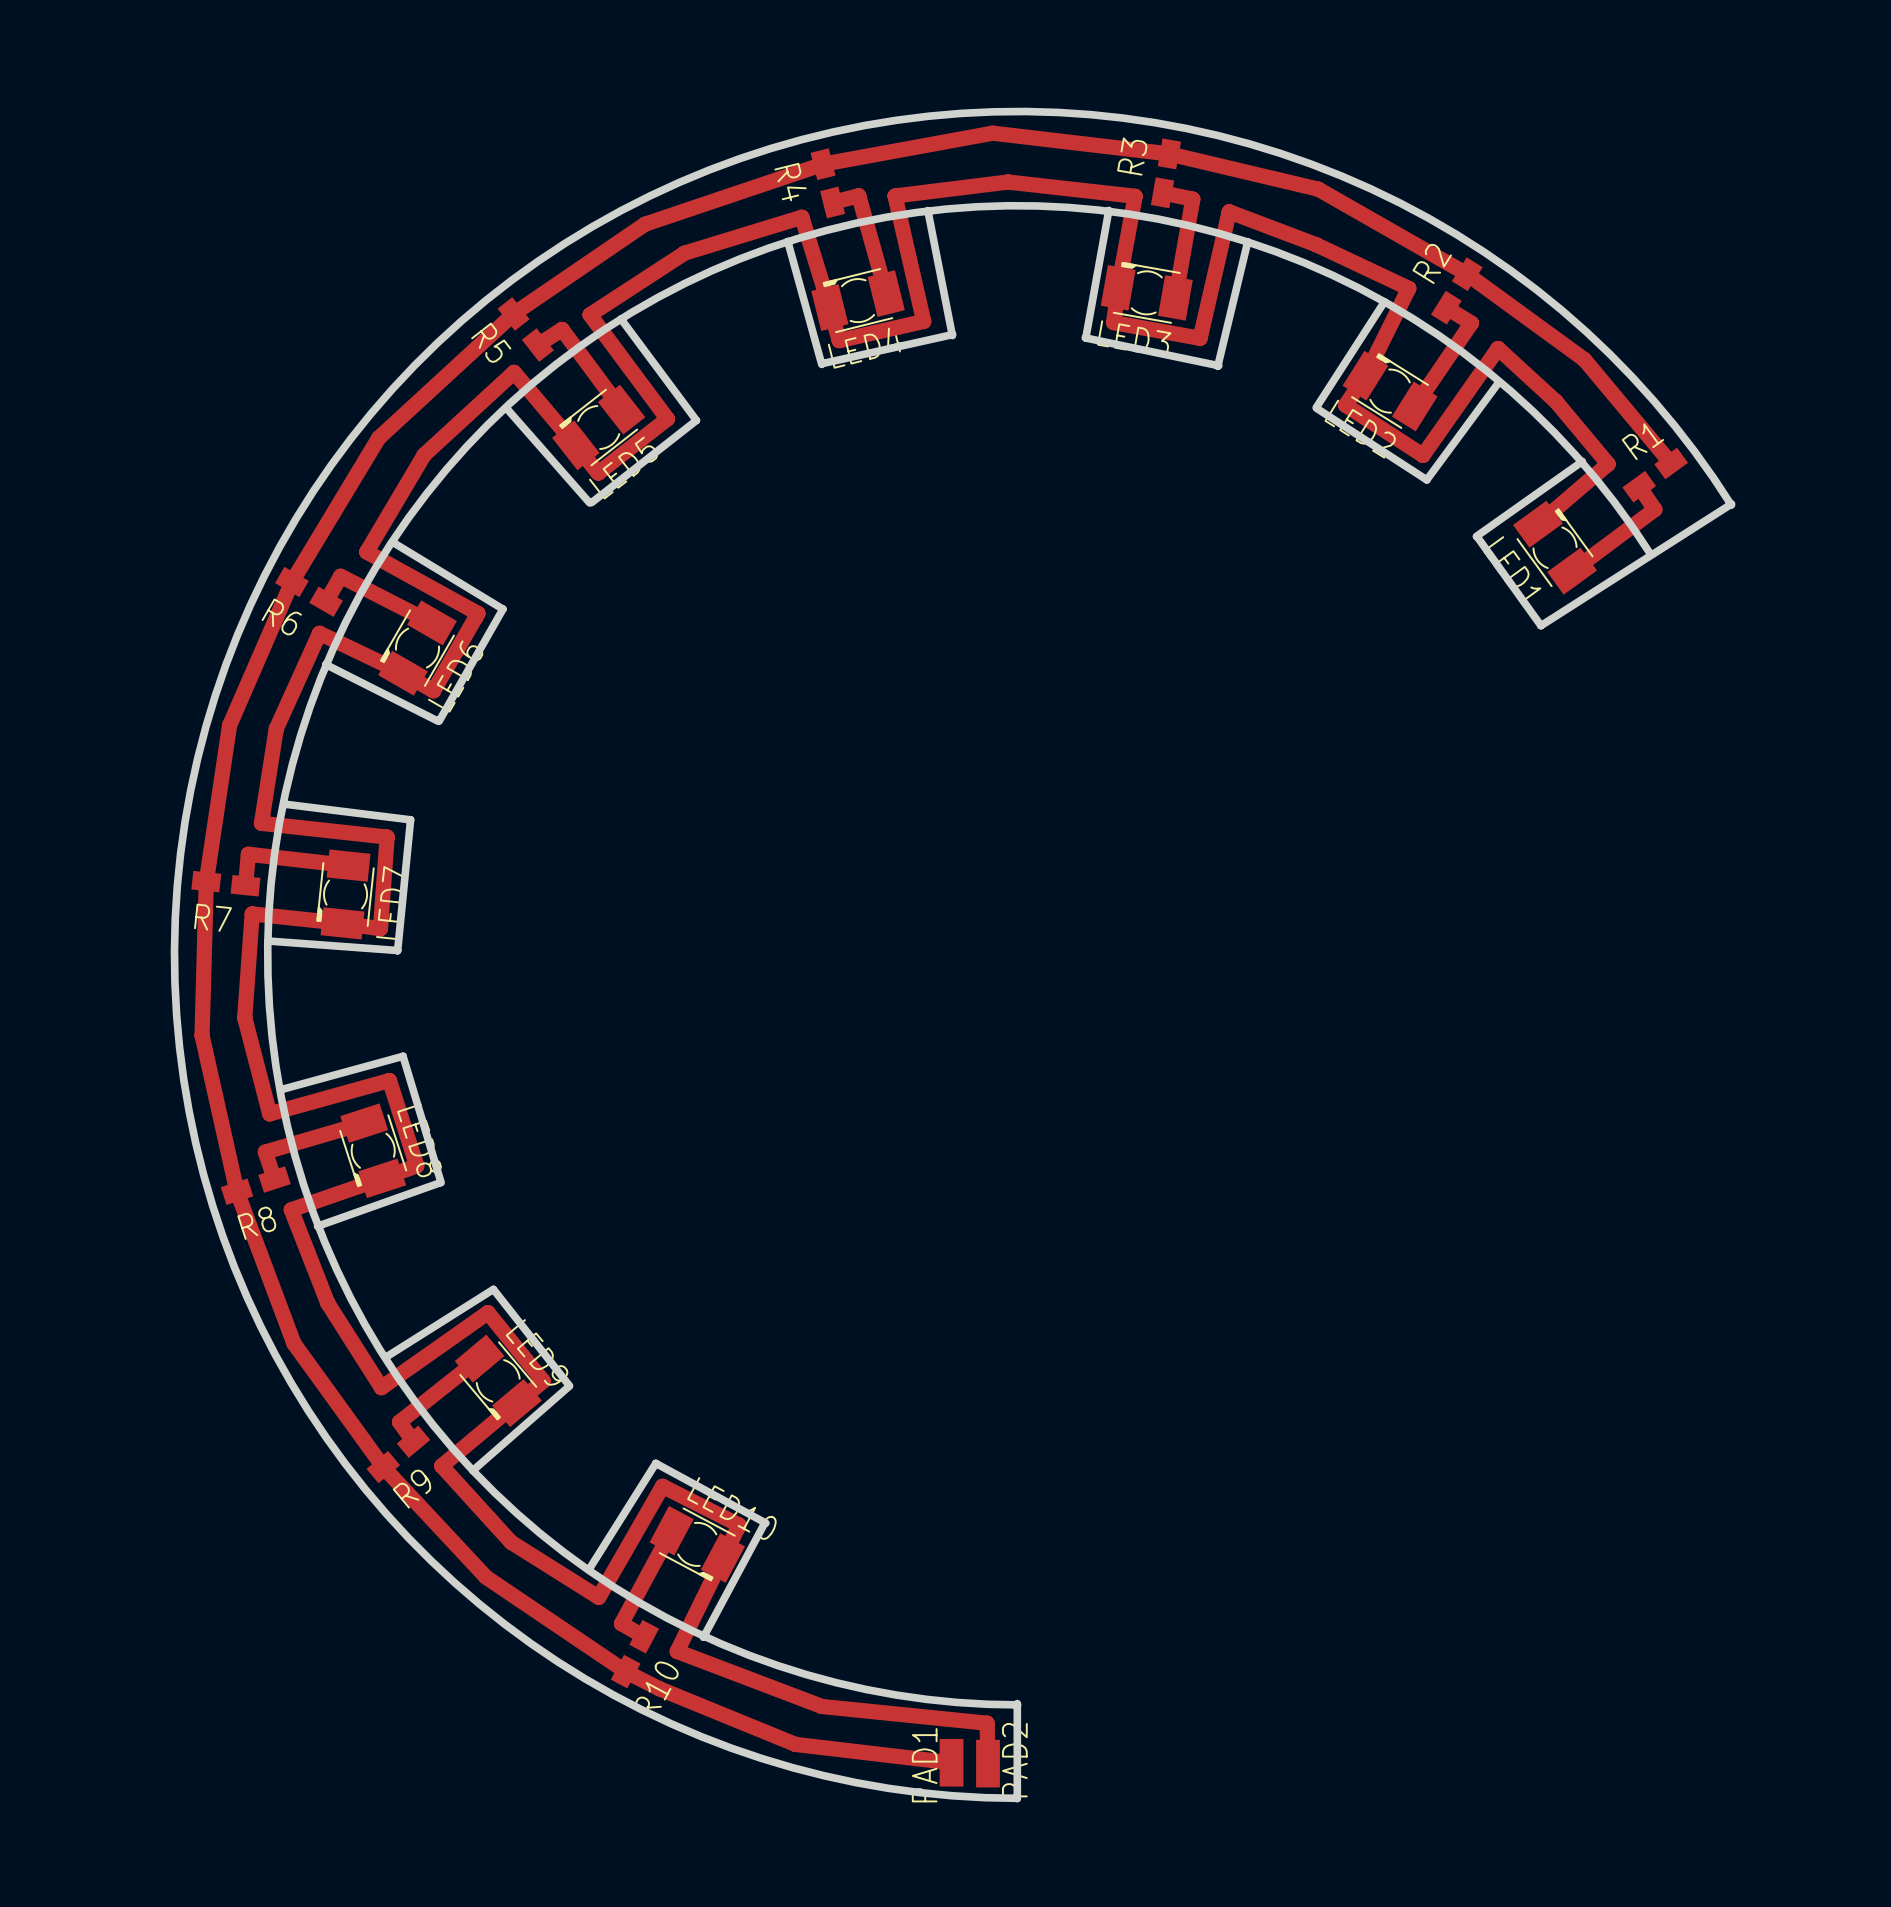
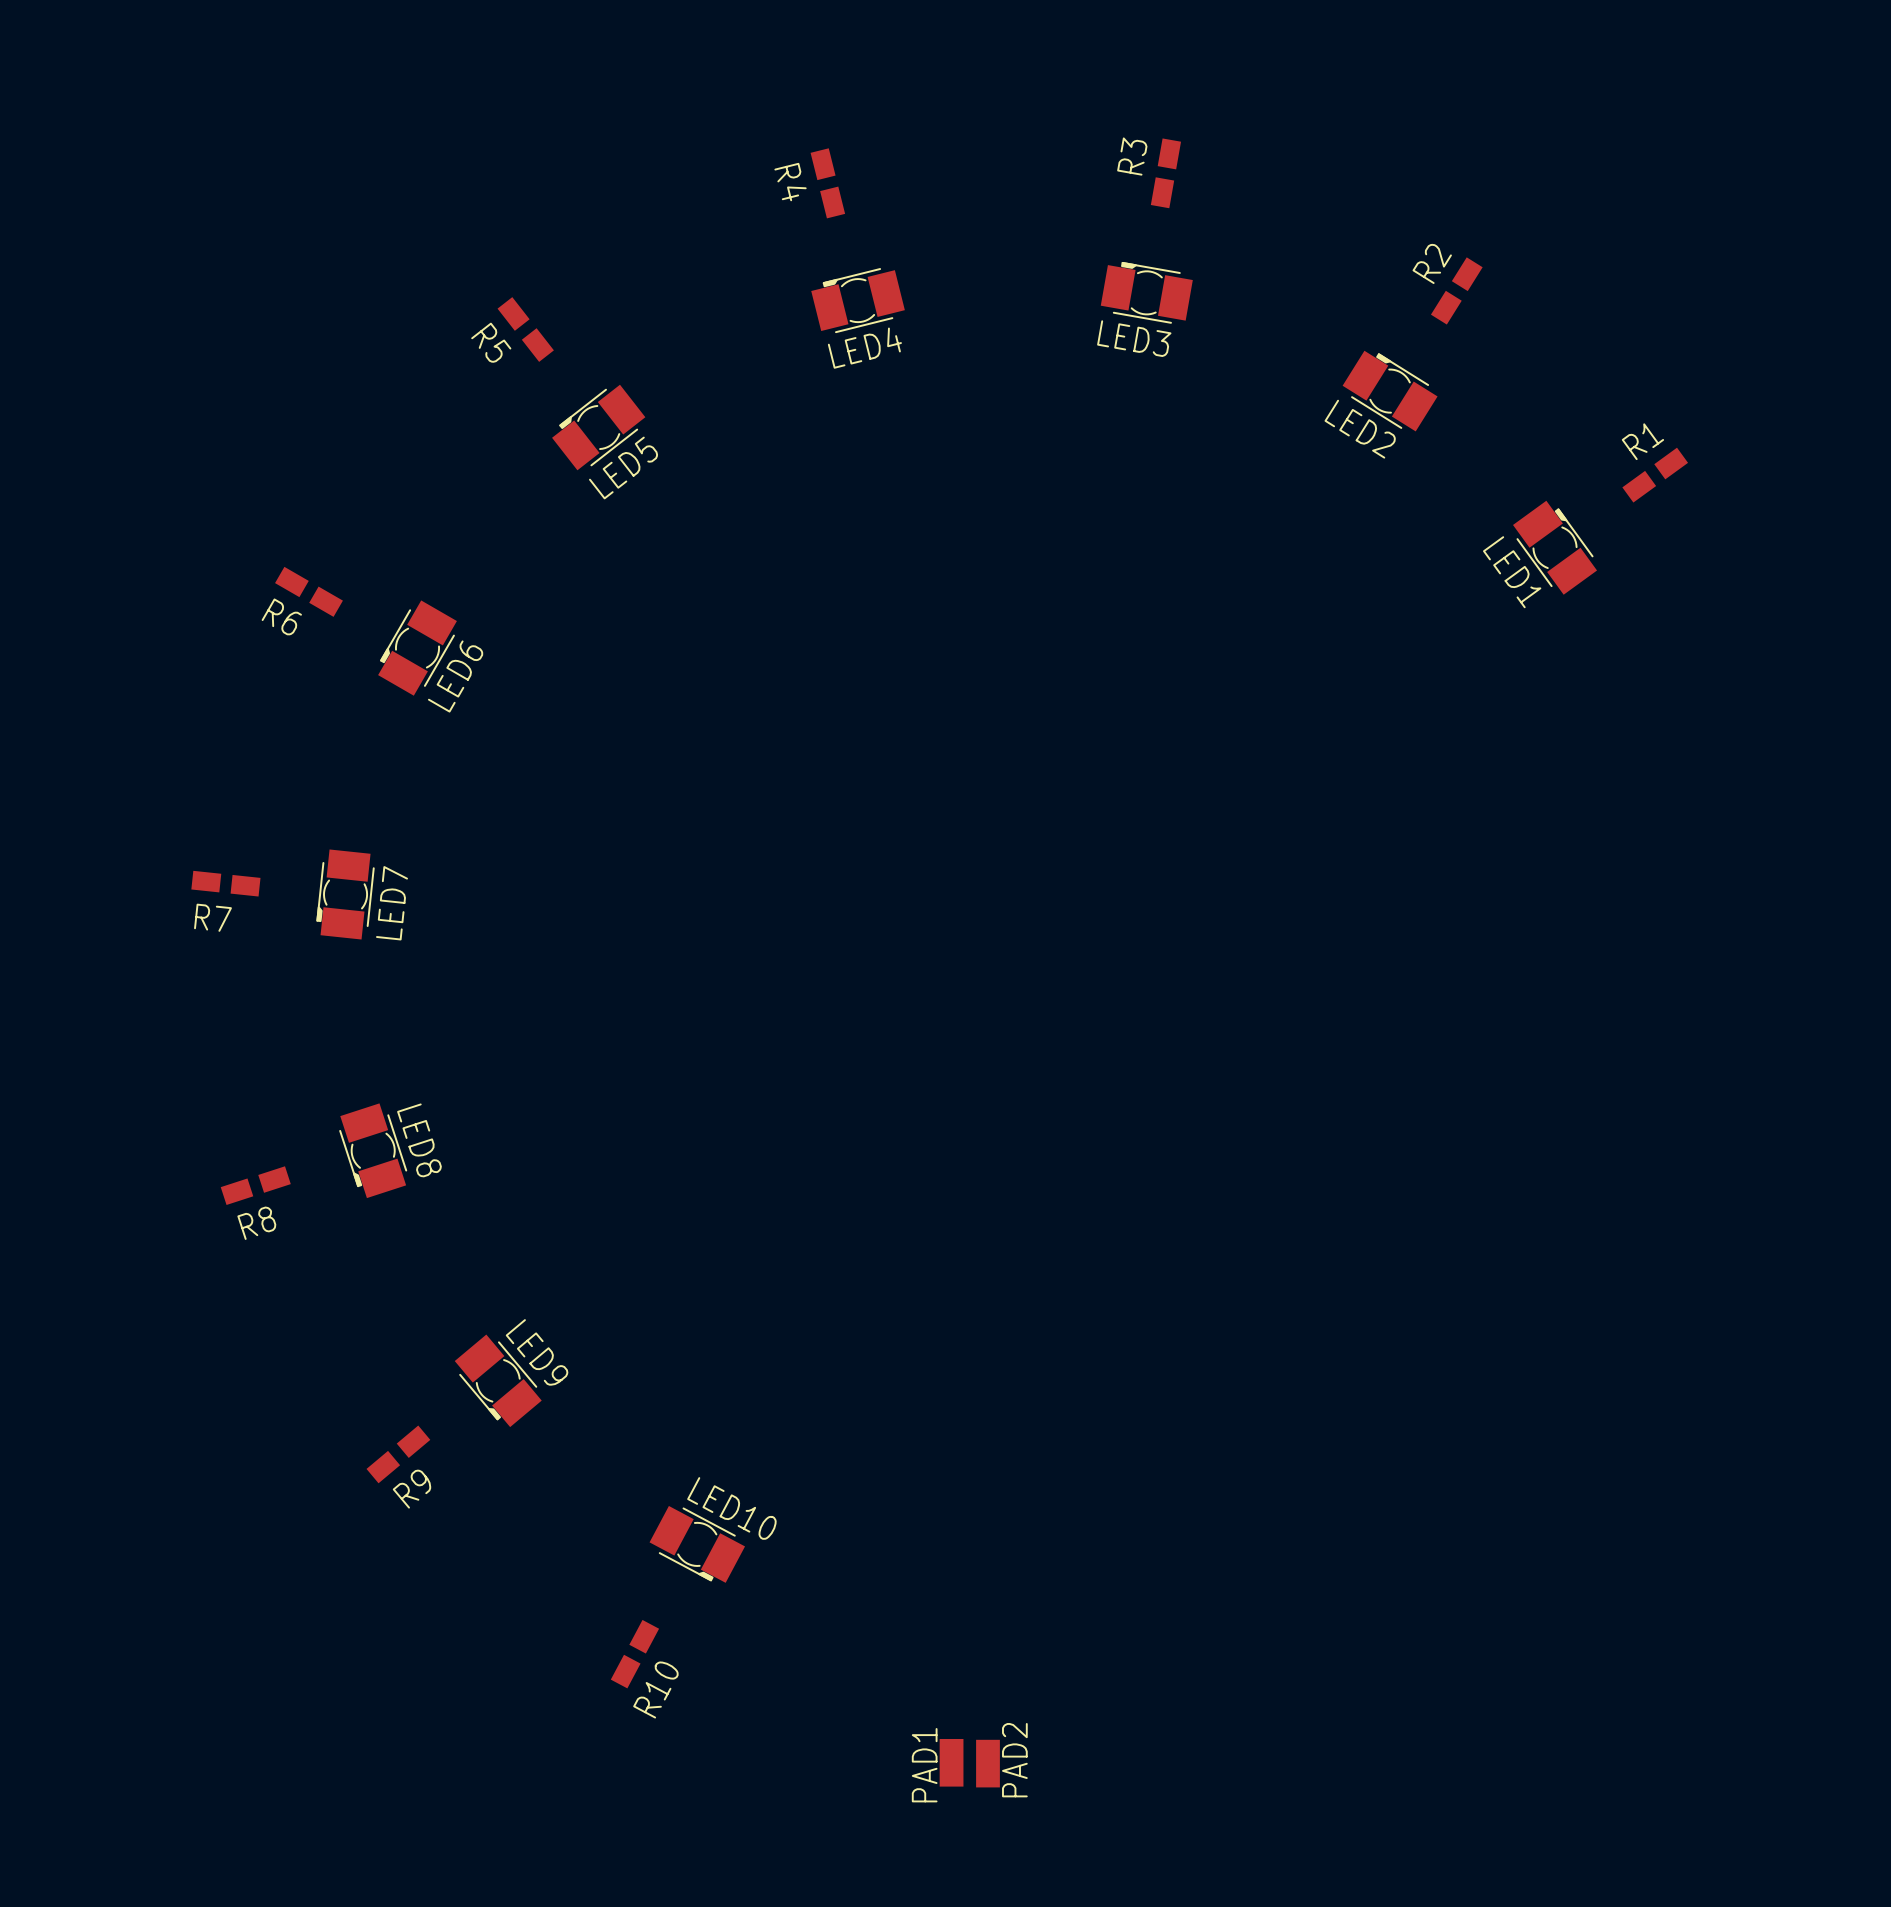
track: (1162, 192) (1192, 199) (1175, 297) -> none
track: (832, 202) (858, 195) (886, 293) -> none
board edge: (927, 210) (952, 335) -> none
board edge: (1108, 210) (1085, 337) -> none
board edge: (787, 241) (821, 364) -> none
board edge: (1247, 241) (1217, 366) -> none
board edge: (1384, 301) (1316, 407) -> none
track: (1446, 307) (1471, 323) (1414, 406) -> none
board edge: (621, 318) (696, 420) (591, 502) -> none
board edge: (952, 334) (823, 363) -> none
board edge: (1085, 337) (1218, 365) -> none
track: (537, 345) (562, 329) (621, 409) -> none
board edge: (1497, 384) (1426, 479) (1316, 408) -> none
board edge: (506, 407) (589, 502) -> none
board edge: (1582, 461) (1476, 536) -> none
track: (1671, 463) (1584, 359) (1467, 274) (1318, 189) (1169, 153) (992, 133) (823, 164) (645, 224) (513, 313) (378, 438) (291, 582) (229, 725) (206, 881) (202, 1035) (237, 1191) (294, 1343) (383, 1467) (486, 1577) (625, 1671) (659, 1688) (795, 1744) (951, 1762) -> none
track: (1639, 486) (1654, 509) (1572, 571) -> none
board edge: (1731, 503) (1540, 625) (1477, 537) -> none
board edge: (1731, 505) (1694, 451) (1654, 401) (1586, 331) (1510, 270) (1456, 234) (1400, 203) (1311, 164) (1218, 135) (1154, 122) (1090, 114) (993, 111) (928, 116) (864, 125) (770, 148) (679, 182) (592, 226) (538, 261) (486, 300) (414, 365) (371, 413) (331, 464) (279, 547) (237, 634) (205, 726) (185, 821) (177, 885) (174, 950) (176, 1015) (183, 1079) (203, 1174) (222, 1236) (246, 1296) (291, 1383) (345, 1463) (386, 1513) (431, 1560) (504, 1624) (557, 1661) (613, 1694) (701, 1736) (761, 1758) (824, 1775) (920, 1792) (1017, 1798) -> none
track: (1537, 524) (1608, 464) (1555, 401) (1498, 348) (1422, 455) (1345, 405) (1365, 375) (1408, 288) (1315, 244) (1229, 211) (1200, 338) (1113, 322) (1135, 196) (1008, 182) (895, 196) (923, 321) (839, 340) (801, 217) (684, 253) (590, 314) (667, 418) (598, 473) (514, 372) (424, 454) (366, 552) (477, 613) (433, 690) (402, 673) (319, 633) (276, 728) (261, 823) (387, 837) (380, 928) (252, 913) (244, 1017) (269, 1113) (389, 1080) (416, 1165) (291, 1209) (327, 1303) (381, 1387) (487, 1312) (543, 1381) (441, 1465) (511, 1542) (598, 1597) (662, 1486) (738, 1524) (677, 1651) (822, 1706) (987, 1723) (987, 1763) -> none
board edge: (394, 543) (502, 609) (439, 721) -> none
board edge: (1649, 551) (1595, 478) (1533, 411) (1463, 352) (1412, 318) (1359, 288) (1304, 262) (1247, 241) (1158, 219) (1068, 207) (976, 206) (886, 217) (797, 238) (739, 258) (684, 283) (605, 329) (532, 383) (466, 447) (408, 517) (359, 595) (320, 677) (292, 764) (274, 854) (268, 914) (267, 975) (275, 1066) (287, 1126) (303, 1185) (337, 1270) (380, 1350) (433, 1425) (473, 1470) (516, 1513) (588, 1570) (666, 1617) (749, 1655) (836, 1682) (926, 1699) (1017, 1704) -> none
track: (326, 601) (340, 576) (432, 622) -> none
board edge: (325, 664) (437, 720) -> none
board edge: (284, 804) (410, 819) (397, 950) -> none
track: (348, 865) (248, 854) (245, 885) -> none
board edge: (268, 941) (397, 950) -> none
board edge: (281, 1089) (403, 1056) (441, 1182) -> none
track: (364, 1123) (265, 1152) (274, 1179) -> none
board edge: (439, 1183) (317, 1226) -> none
board edge: (386, 1356) (493, 1289) (569, 1385) -> none
track: (479, 1358) (399, 1422) (413, 1441) -> none
board edge: (568, 1386) (472, 1470) -> none
board edge: (764, 1523) (703, 1637) -> none
board edge: (765, 1523) (655, 1463) (589, 1568) -> none
track: (671, 1530) (621, 1623) (644, 1636) -> none
board edge: (1017, 1703) (1017, 1798) -> none

